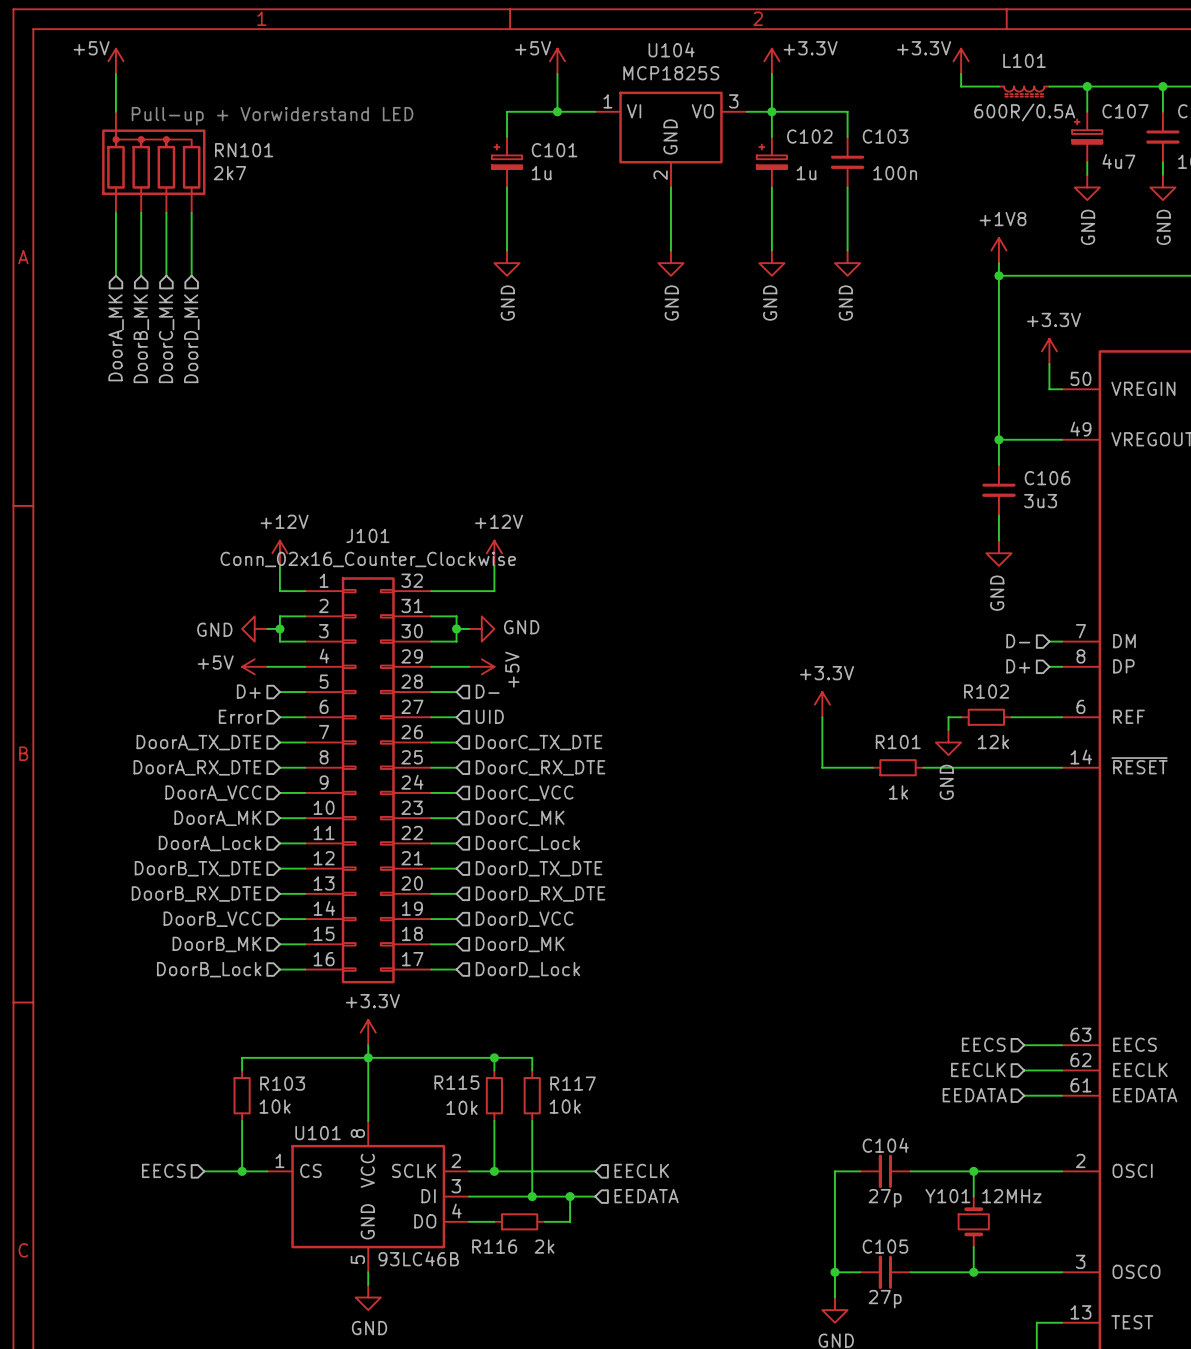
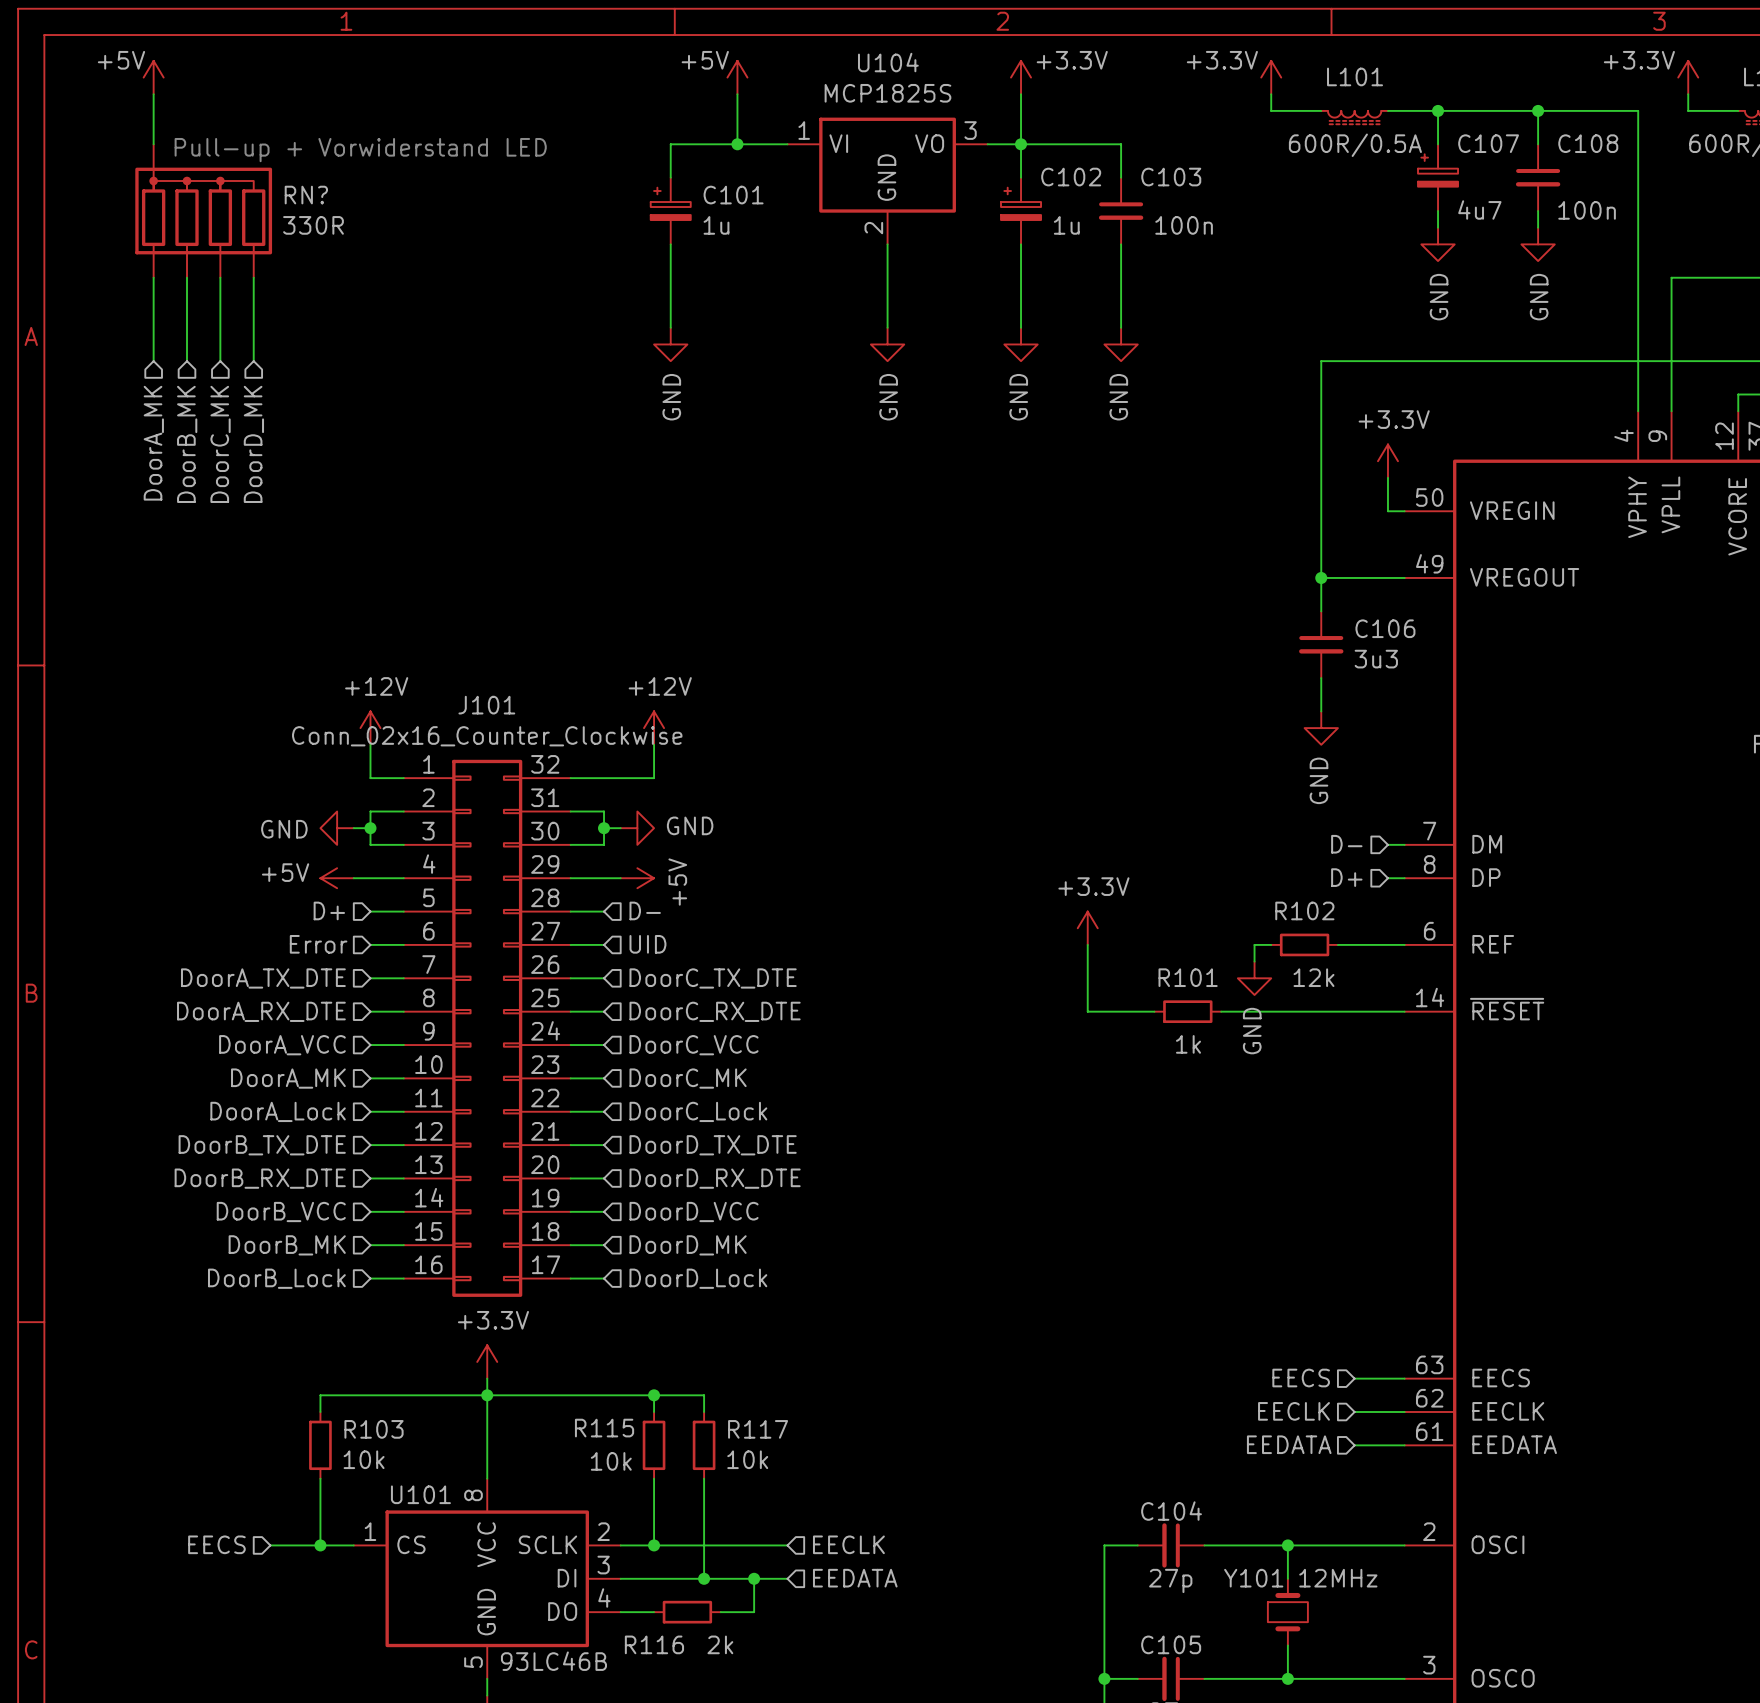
RN101 name: RN101 (244, 150) -> RN? (306, 195)
RN101 value: 2k7 (229, 173) -> 330R (313, 225)
power symbol: +1V8 (998, 250) -> none
wire: (998, 263) (998, 275) -> none
junction: (998, 275) -> none

